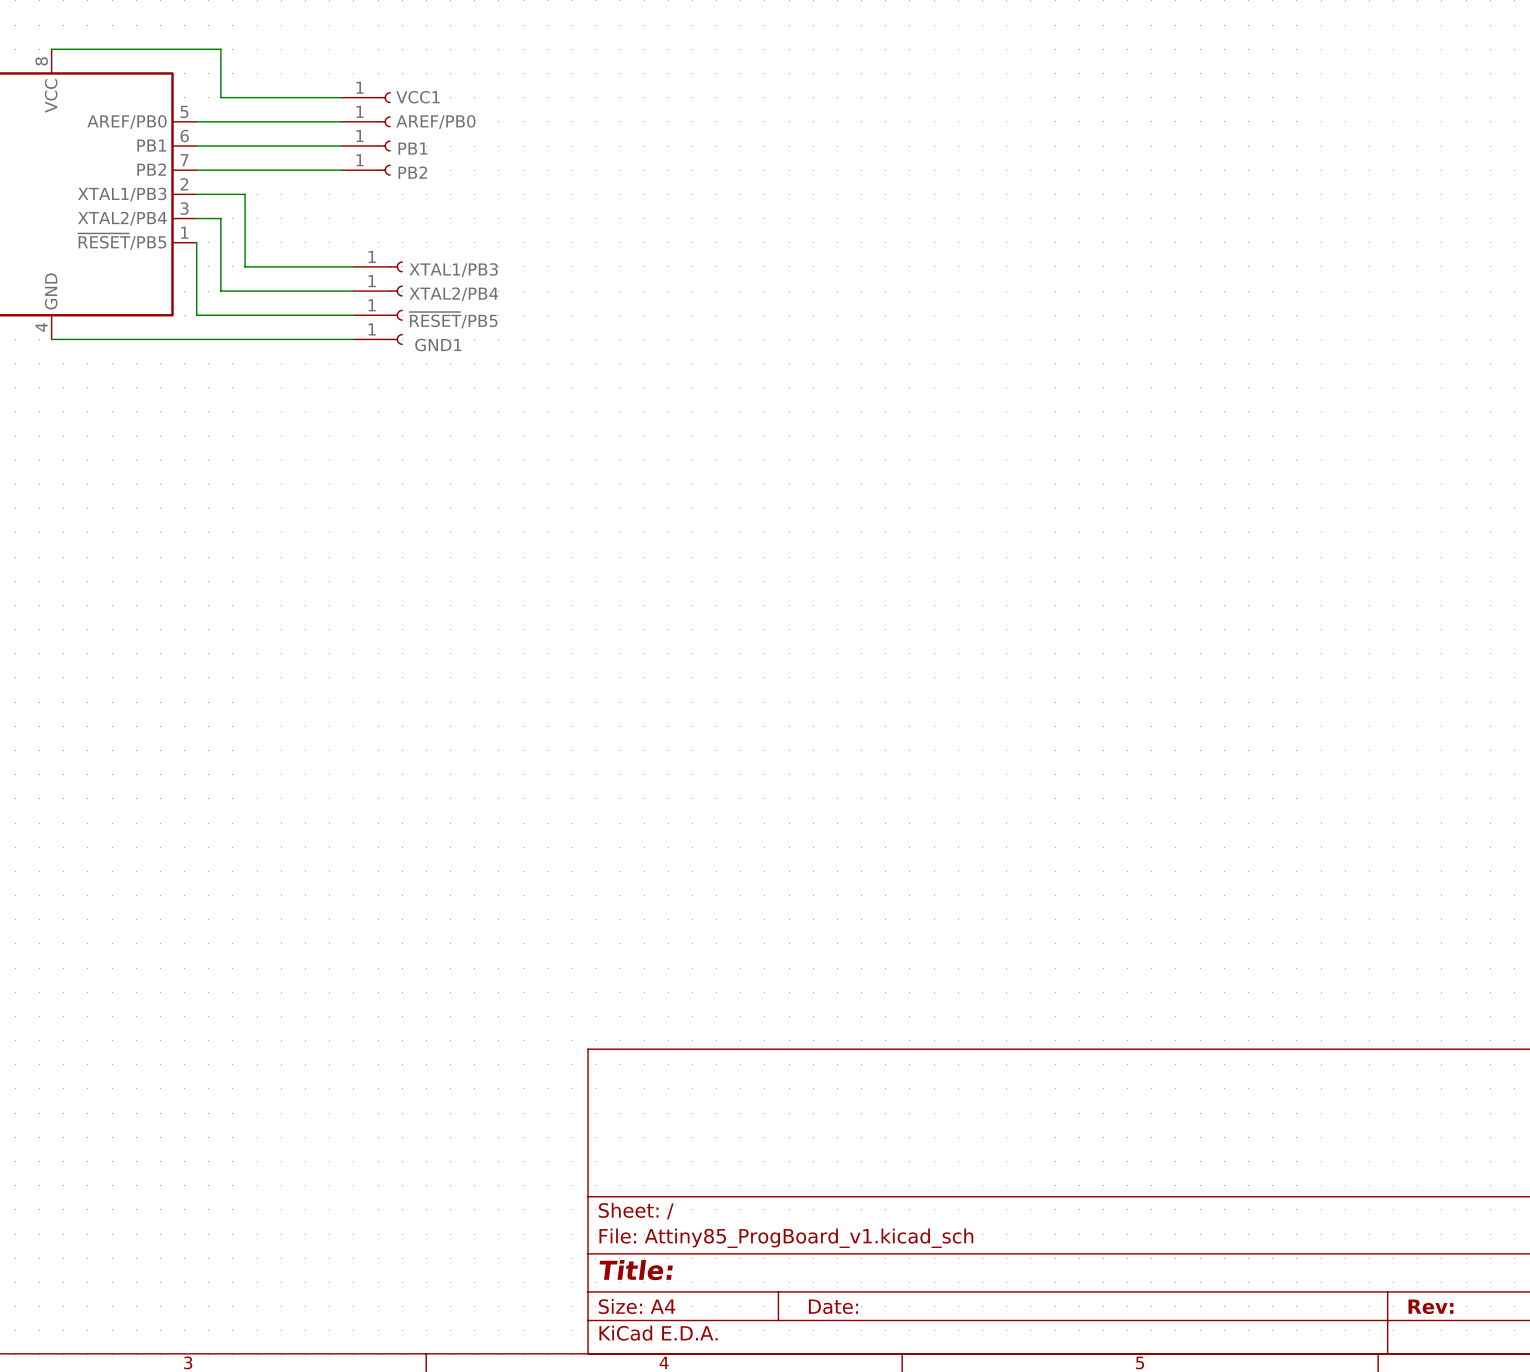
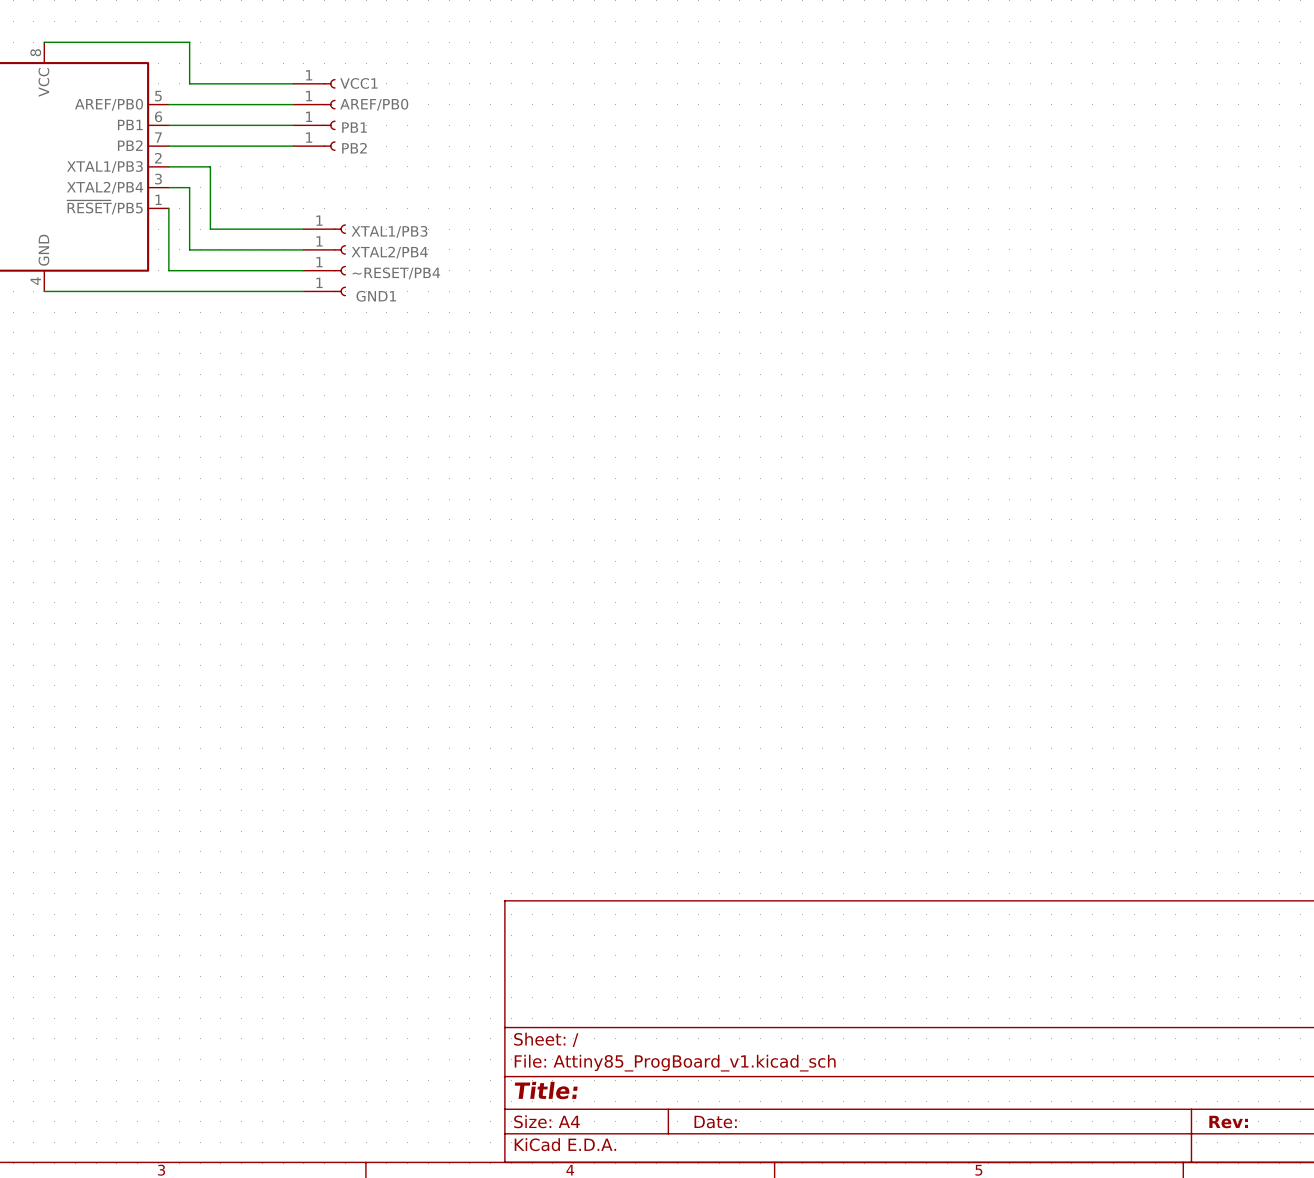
~{RESET}/PB5 name: ~{RESET}/PB5 (453, 320) -> ~RESET/PB4 (396, 273)

